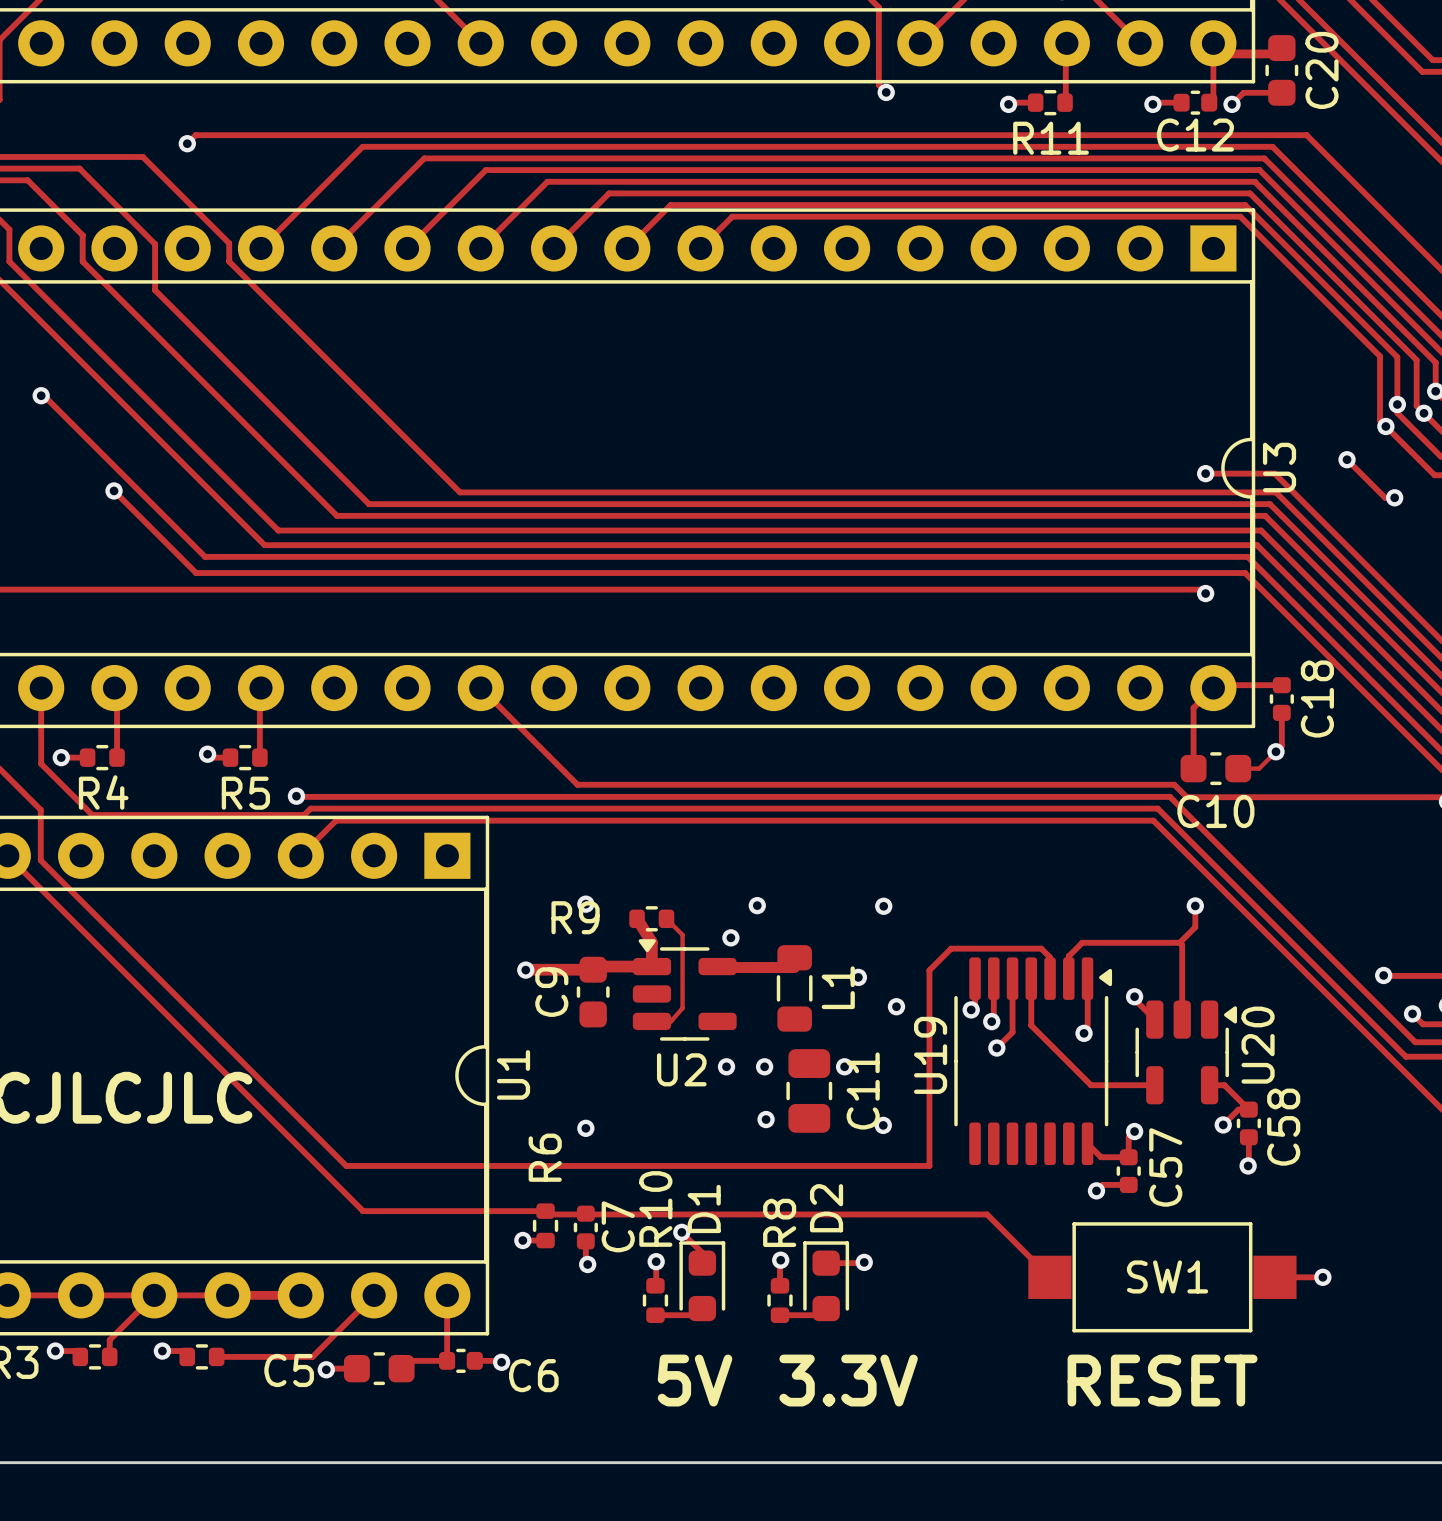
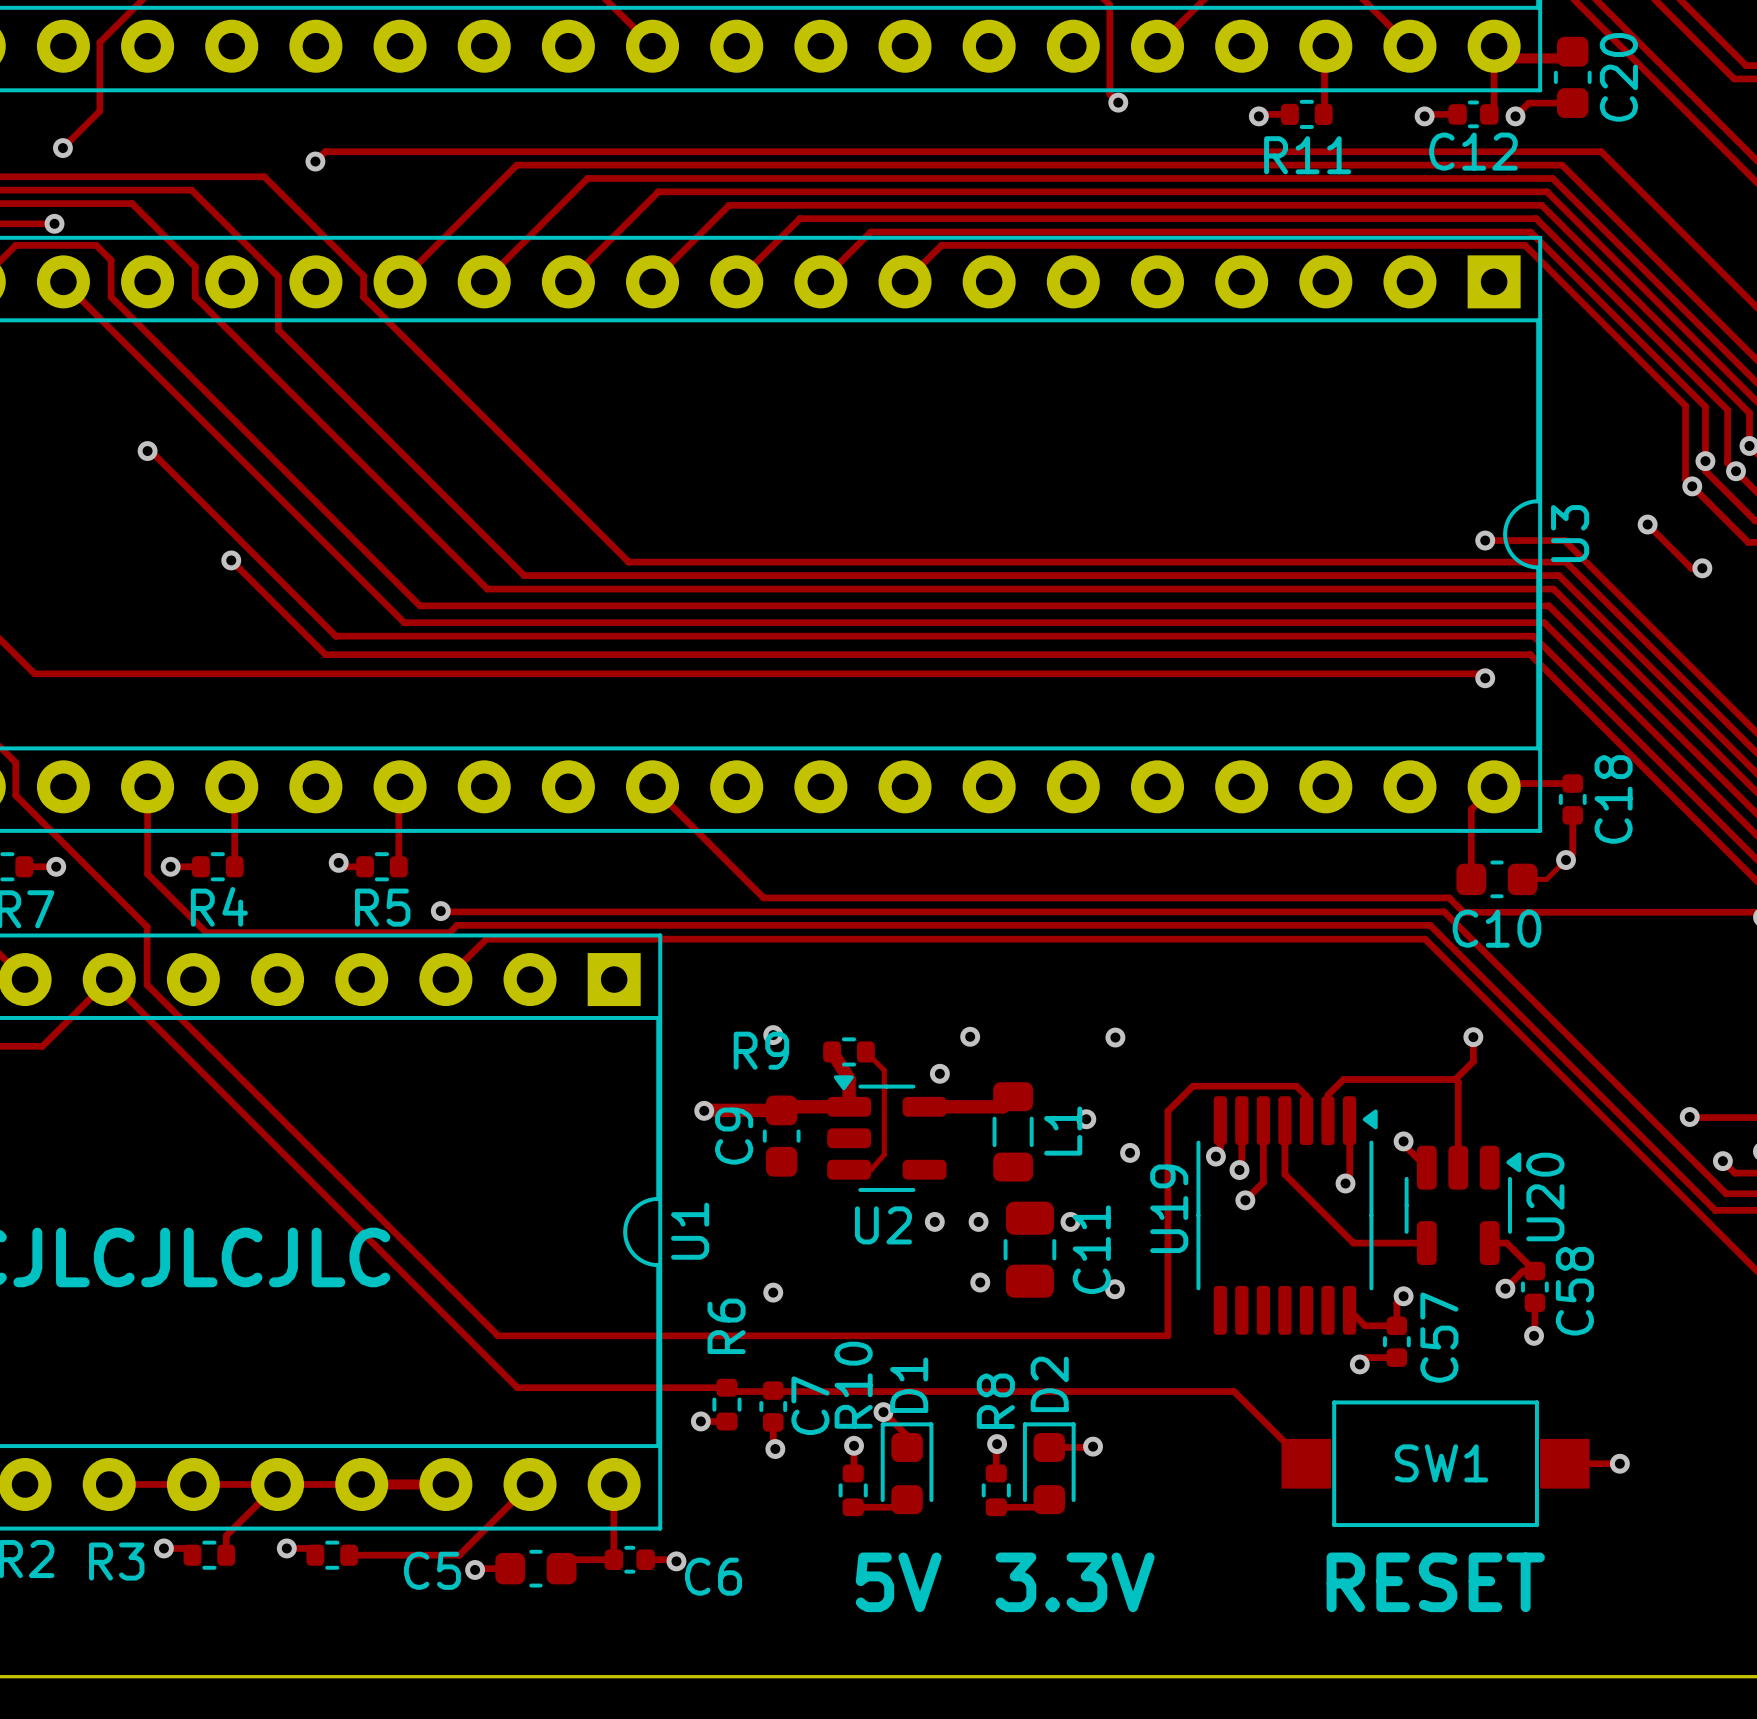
track: none -> (1013, 1096) (1002, 1106) (924, 1106)
track: (718, 967) (794, 967) -> none

